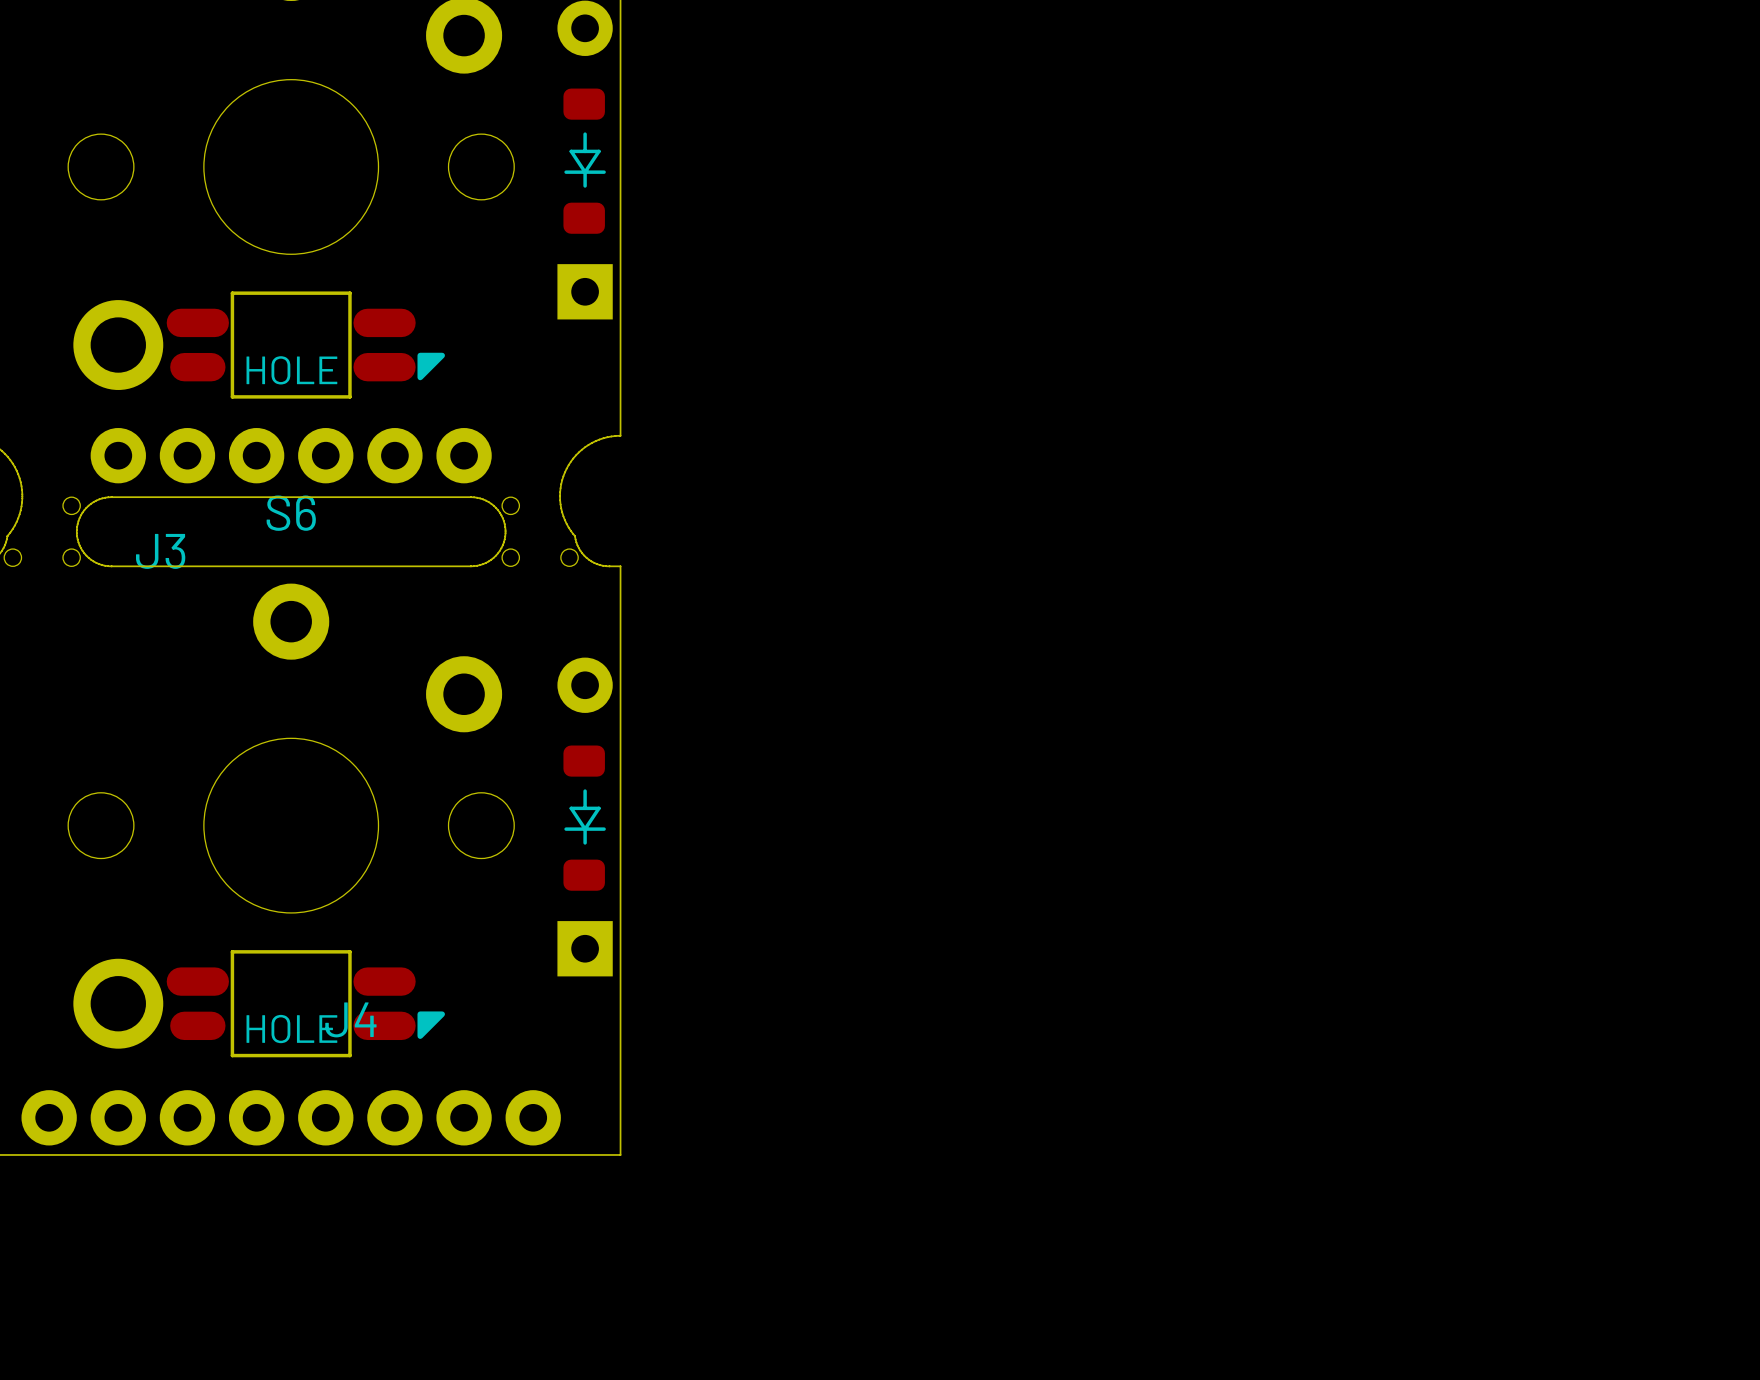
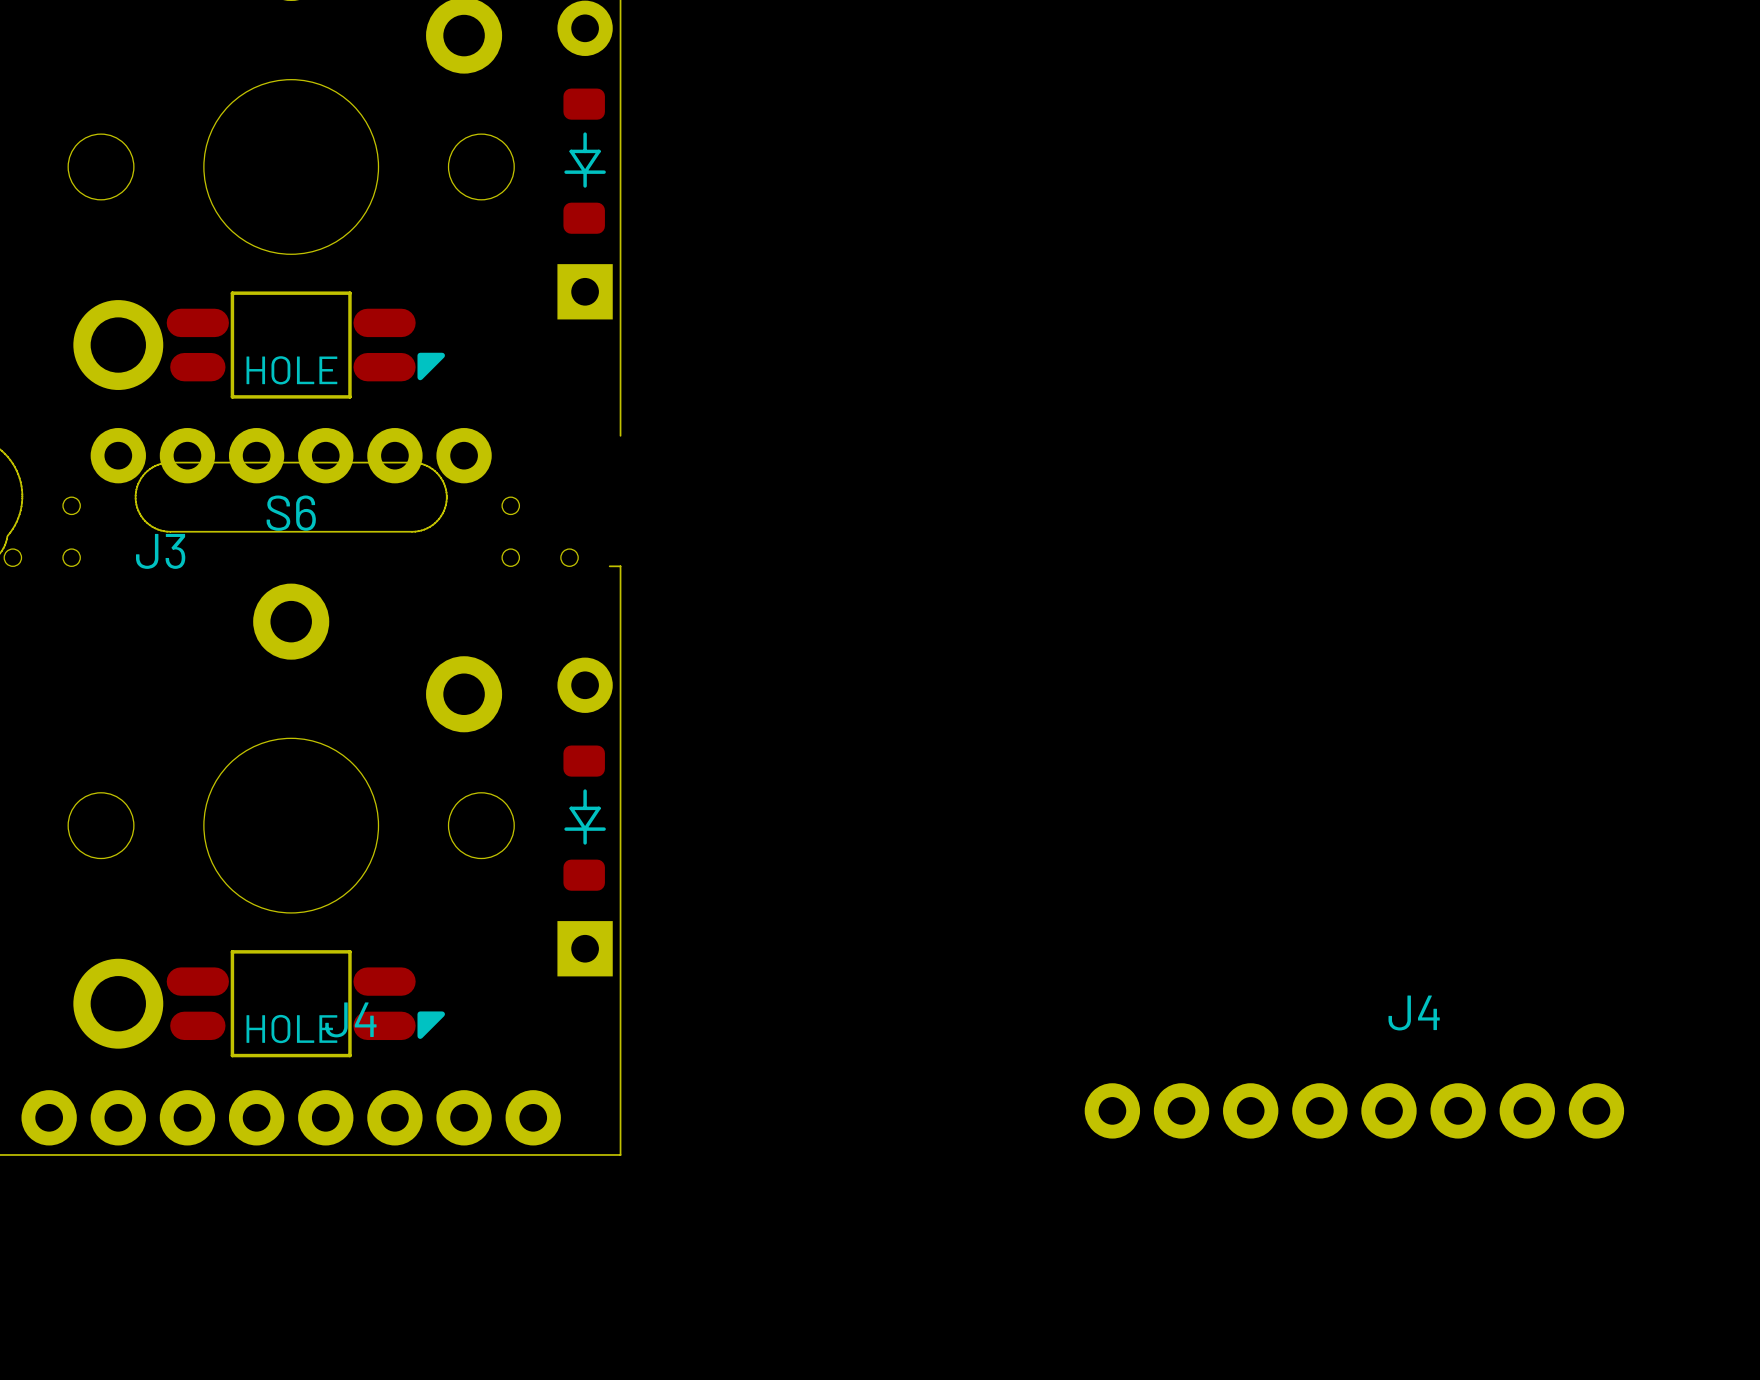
board edge: (620, 435) (599, 439) (578, 452) (564, 472) (560, 492) (563, 516) (574, 536) (580, 550) (594, 562) (609, 566) -> none
board edge: none -> (170, 462) (411, 462)
board edge: none -> (412, 462) (424, 464) (437, 473) (444, 483) (446, 497) (444, 510) (437, 521) (424, 529) (412, 531)
board edge: (111, 497) (99, 499) (88, 505) (79, 518) (76, 530) (79, 545) (86, 555) (99, 564) (111, 566) -> (170, 462) (158, 464) (145, 473) (138, 483) (135, 495) (137, 507) (145, 521) (158, 529) (170, 531)
board edge: (111, 497) (474, 497) (485, 500) (495, 507) (502, 518) (505, 531) (502, 545) (495, 555) (485, 562) (474, 566) (111, 566) -> none
board edge: none -> (170, 531) (411, 531)
J4: none -> (1354, 1110)

